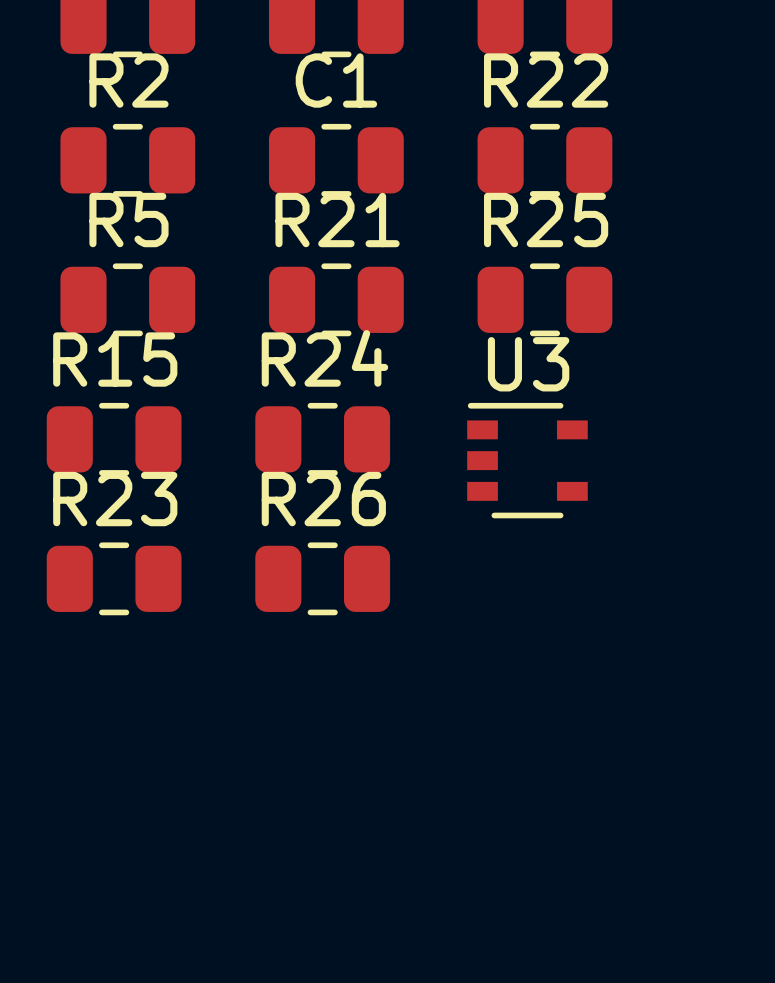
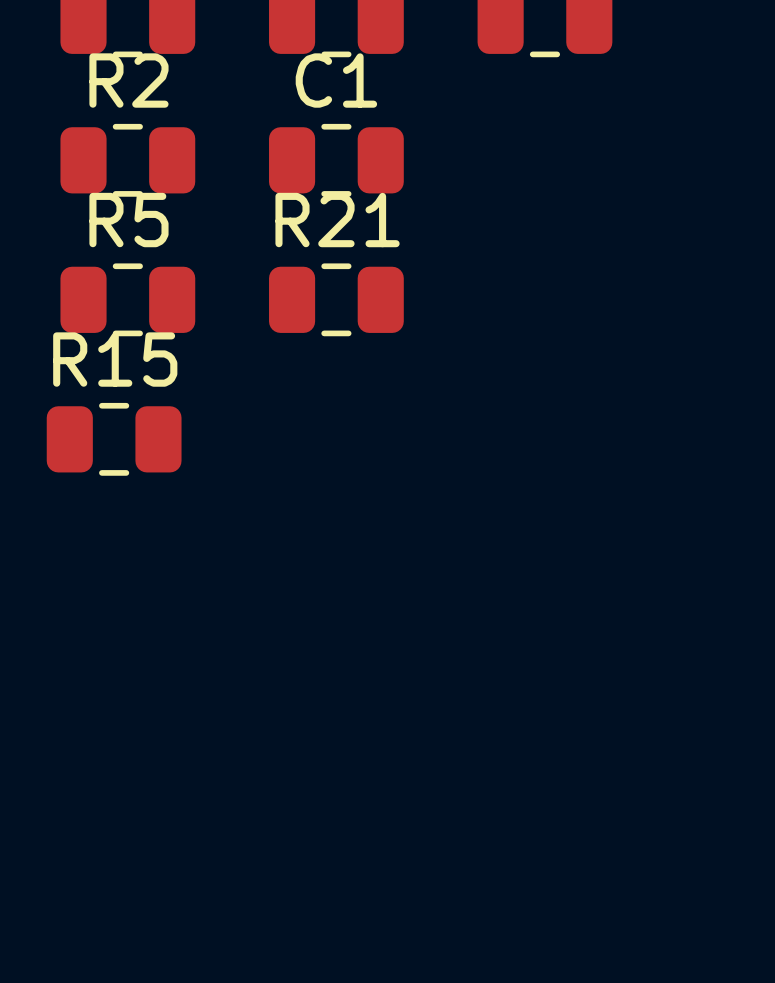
R22: (544, 160) -> none
R25: (544, 299) -> none
R24: (322, 439) -> none
U3: (527, 460) -> none
R23: (114, 578) -> none
R26: (322, 578) -> none

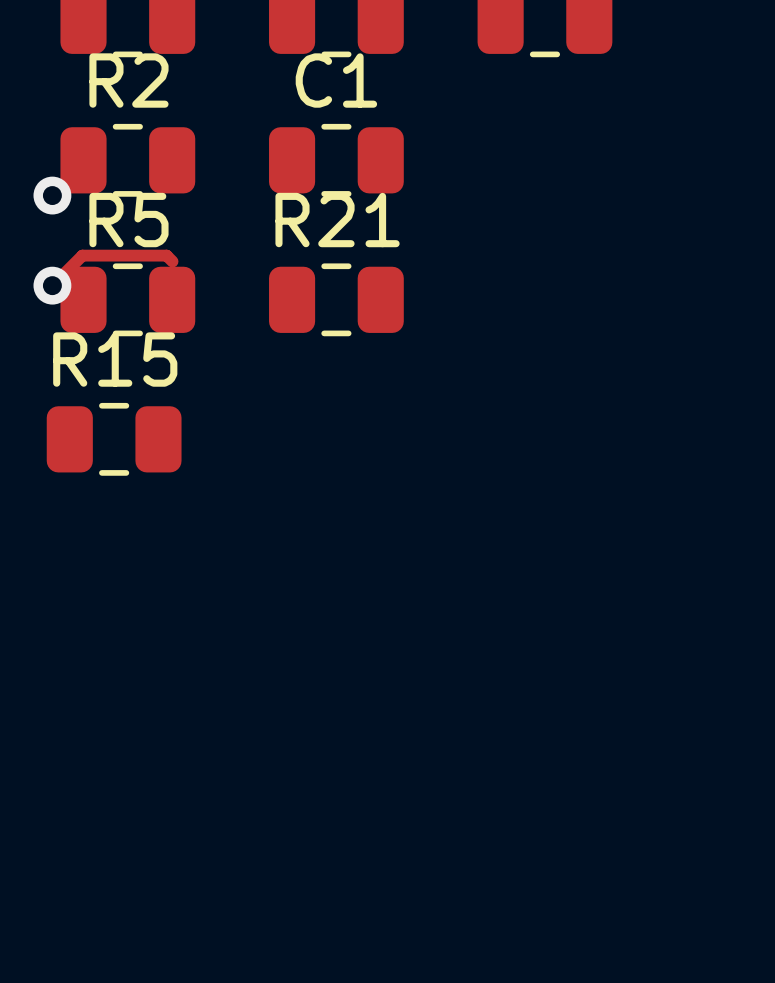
via: none -> (52, 195)
top track: none -> (172, 261) (166, 255) (82, 255) (52, 285)
via: none -> (52, 285)

